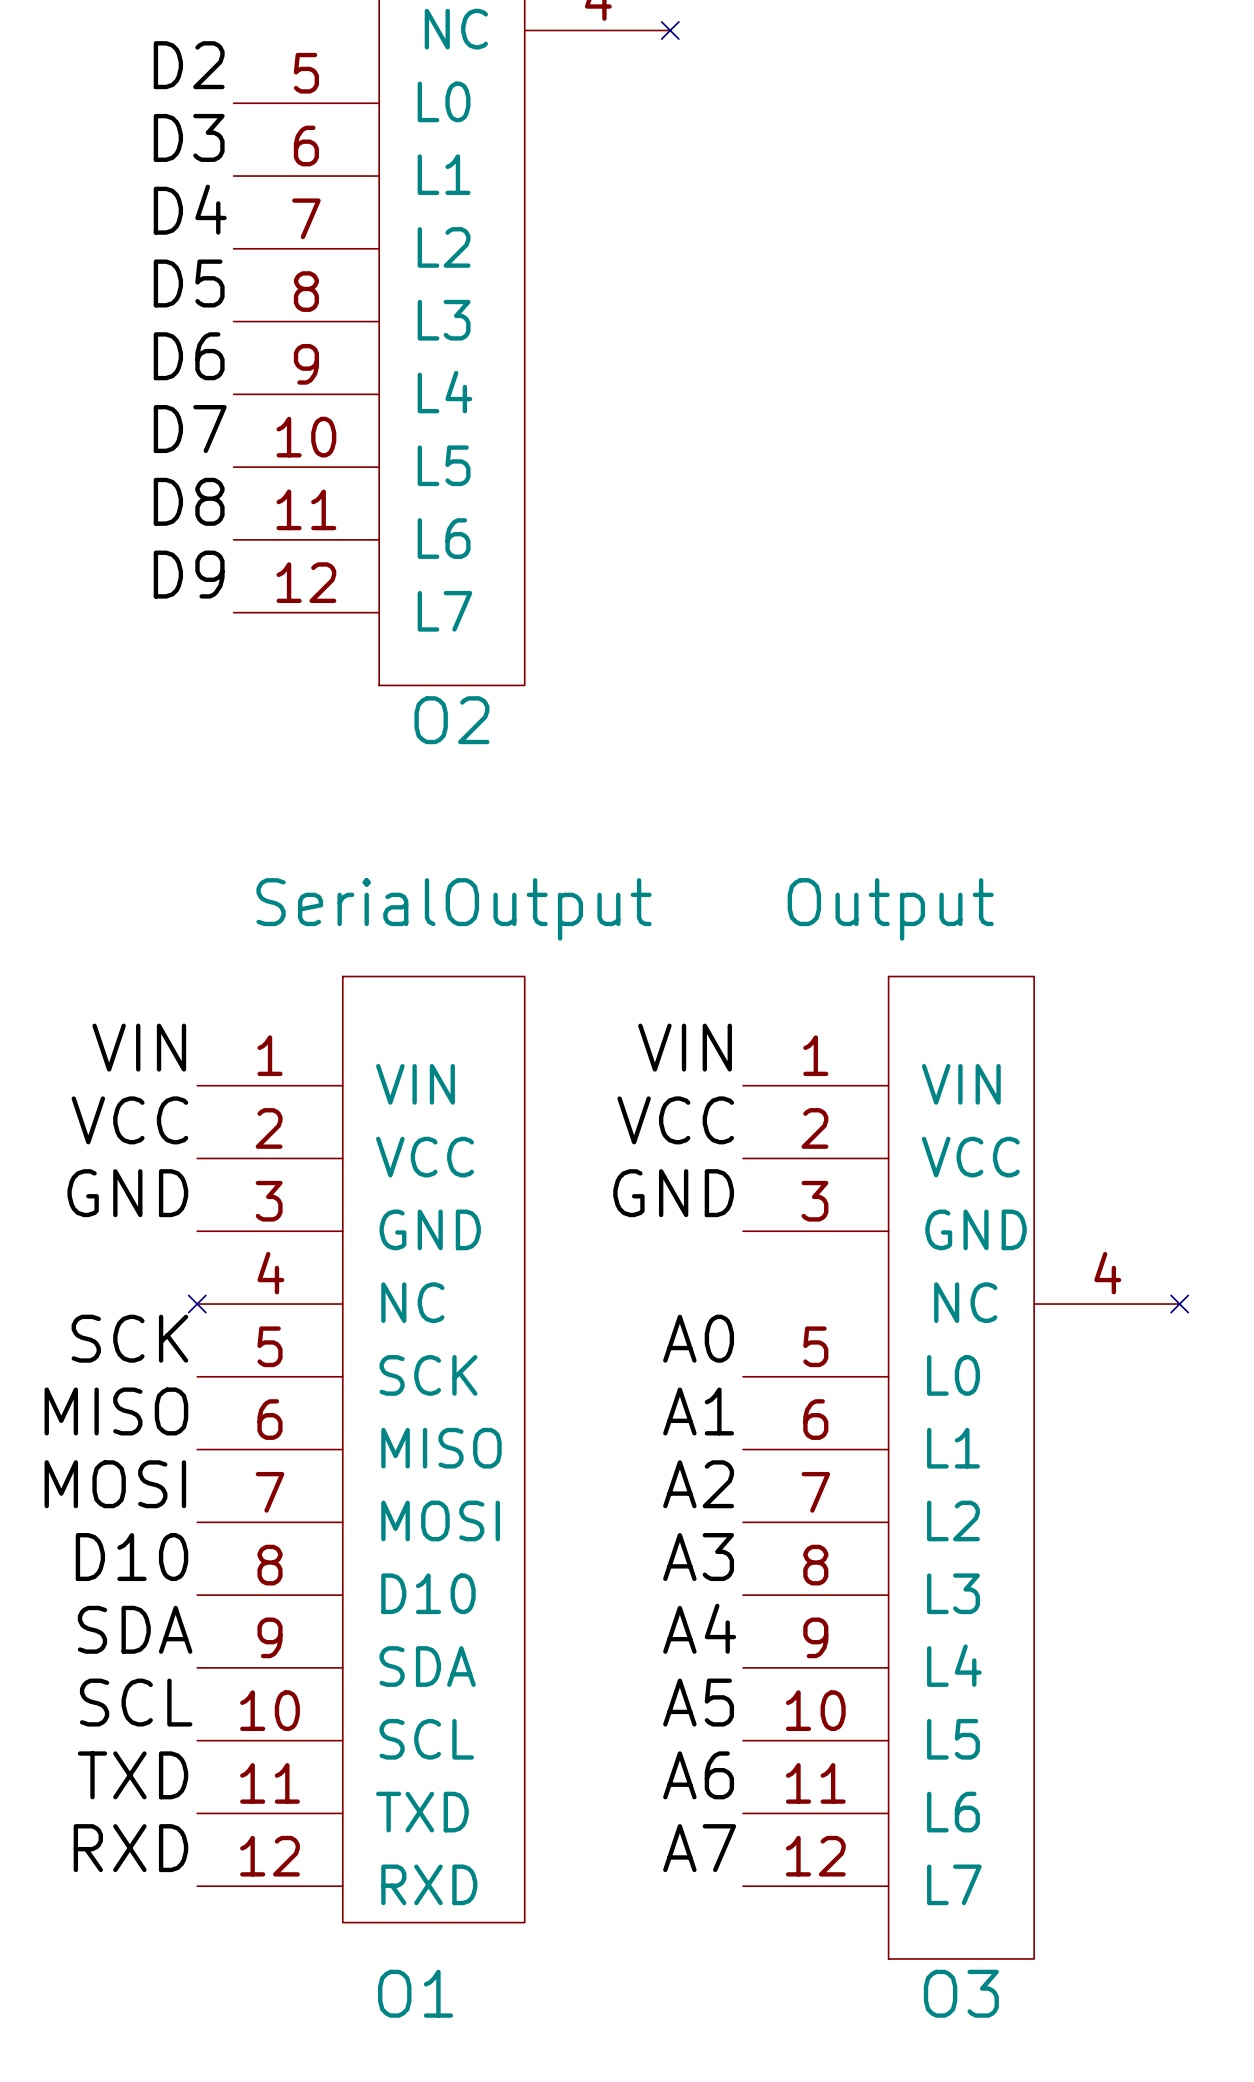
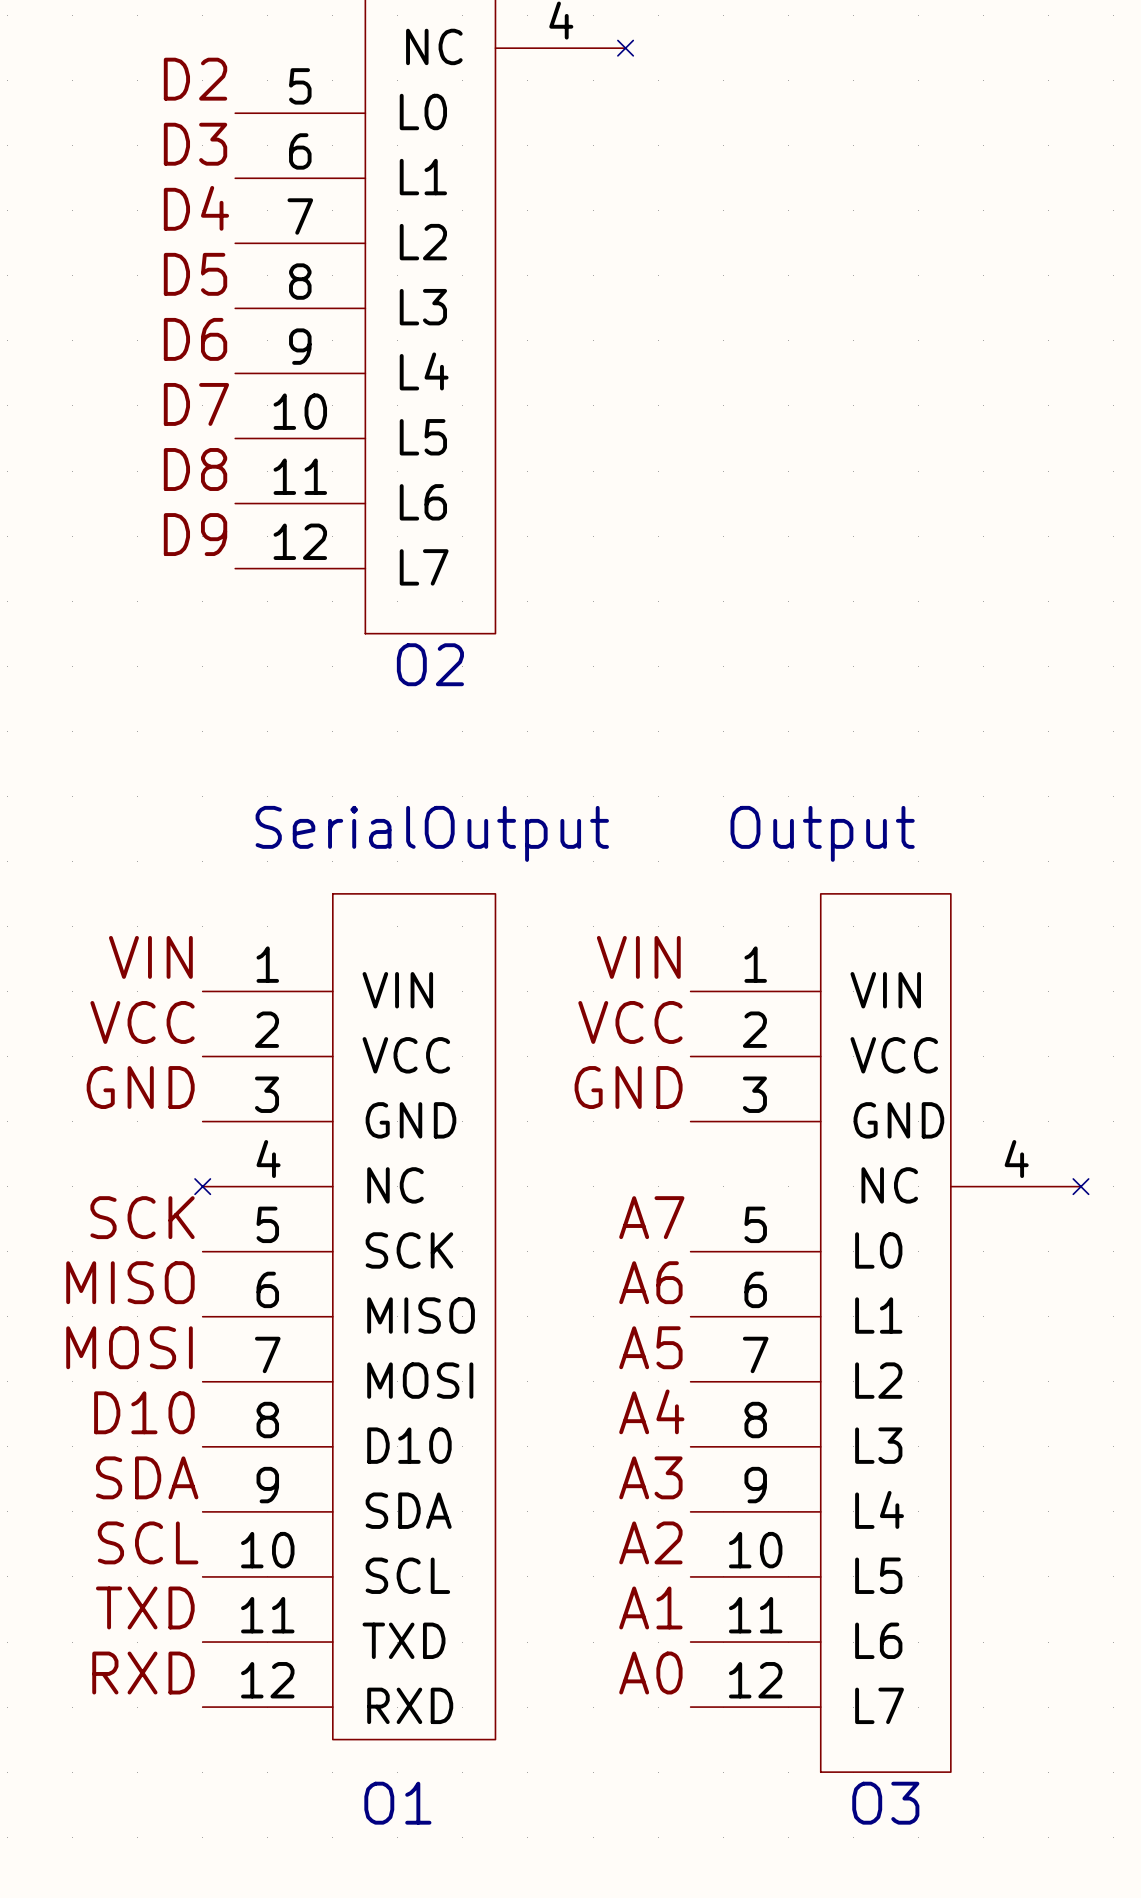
label: A0 (698, 1338) -> A7 (651, 1217)
label: A1 (698, 1411) -> A6 (650, 1282)
label: A2 (698, 1484) -> A5 (650, 1347)
label: A3 (698, 1557) -> A4 (651, 1411)
label: A4 (699, 1628) -> A3 (650, 1477)
label: A5 (698, 1702) -> A2 (650, 1542)
label: A6 (698, 1775) -> A1 (650, 1607)
label: A7 (699, 1848) -> A0 (650, 1673)

